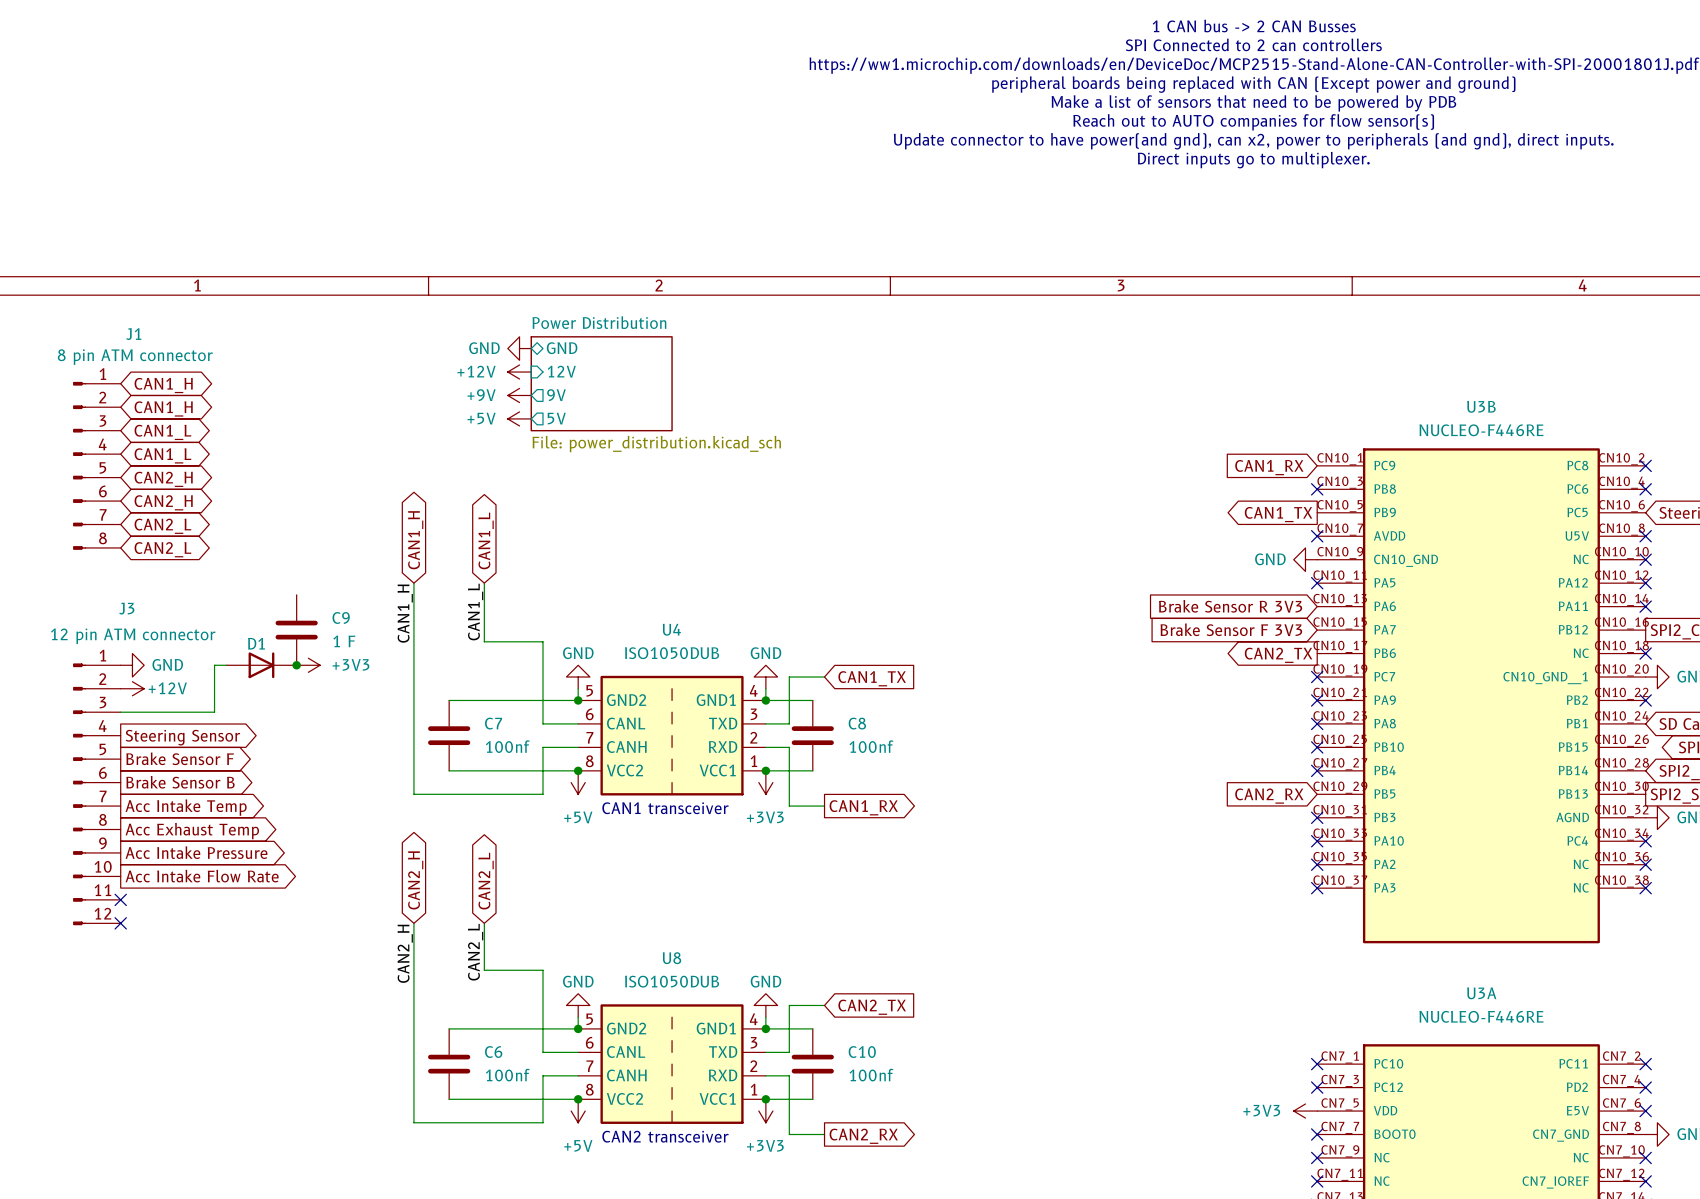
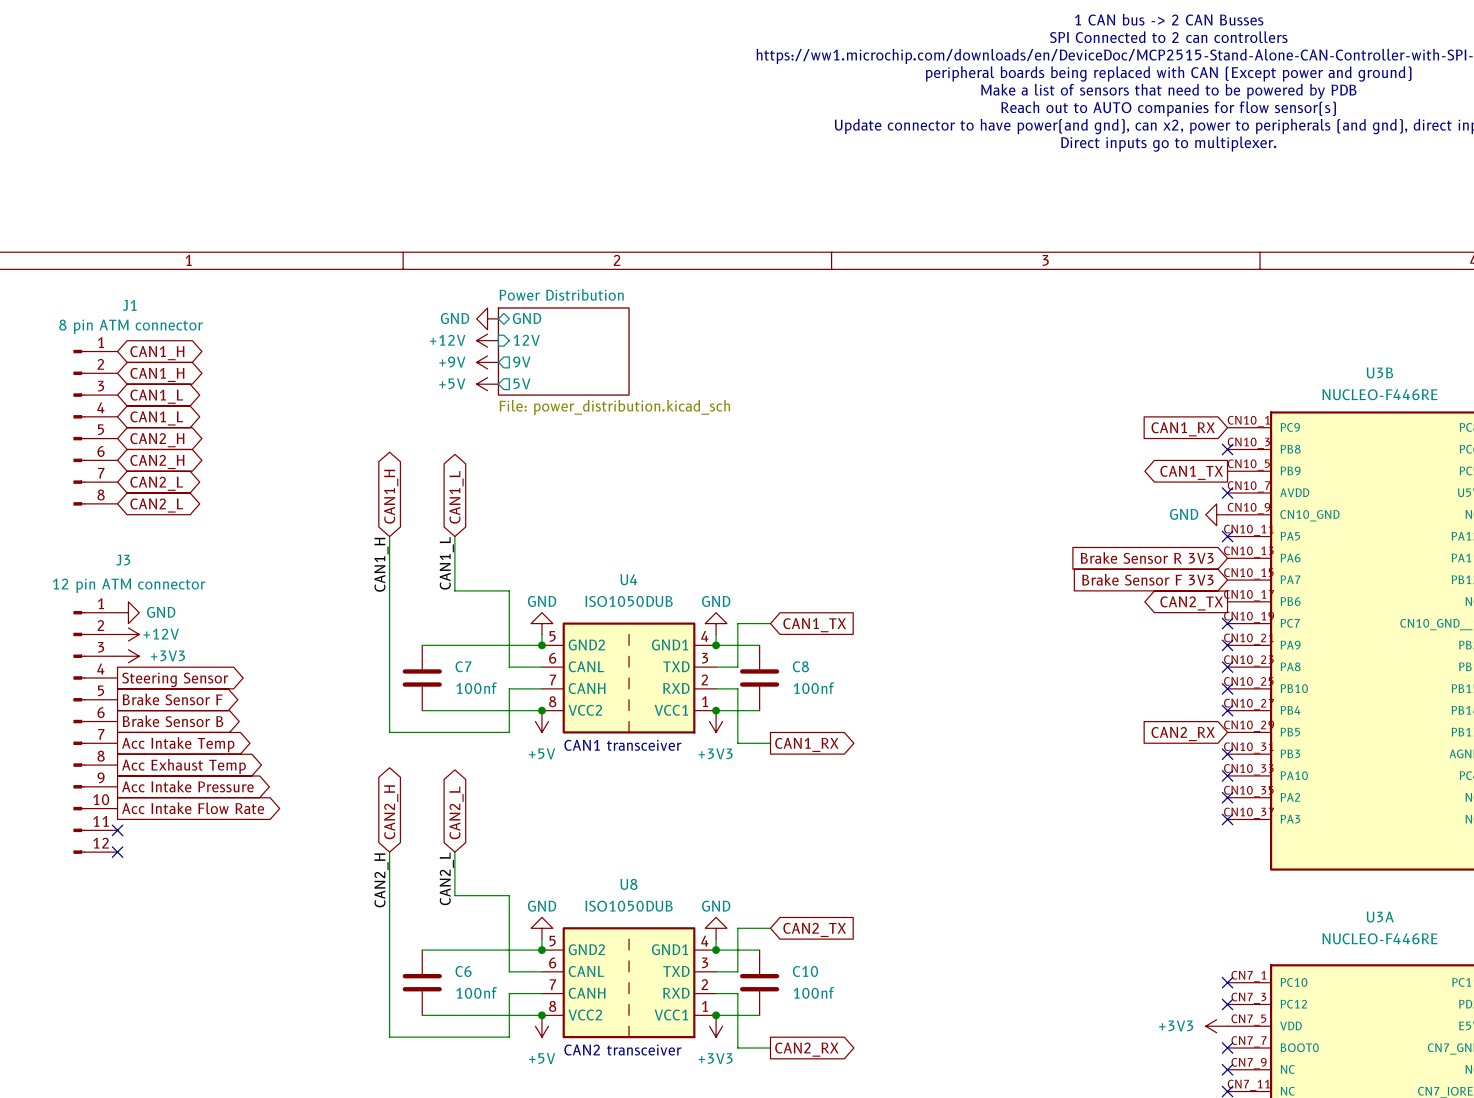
C9: 1 F (296, 630) -> none
wire: (226, 665) (214, 665) (214, 712) (120, 712) -> none
D1: (261, 665) -> none
junction: (296, 665) -> none
power symbol position: +3V3 (308, 665) -> +3V3 (128, 656)

